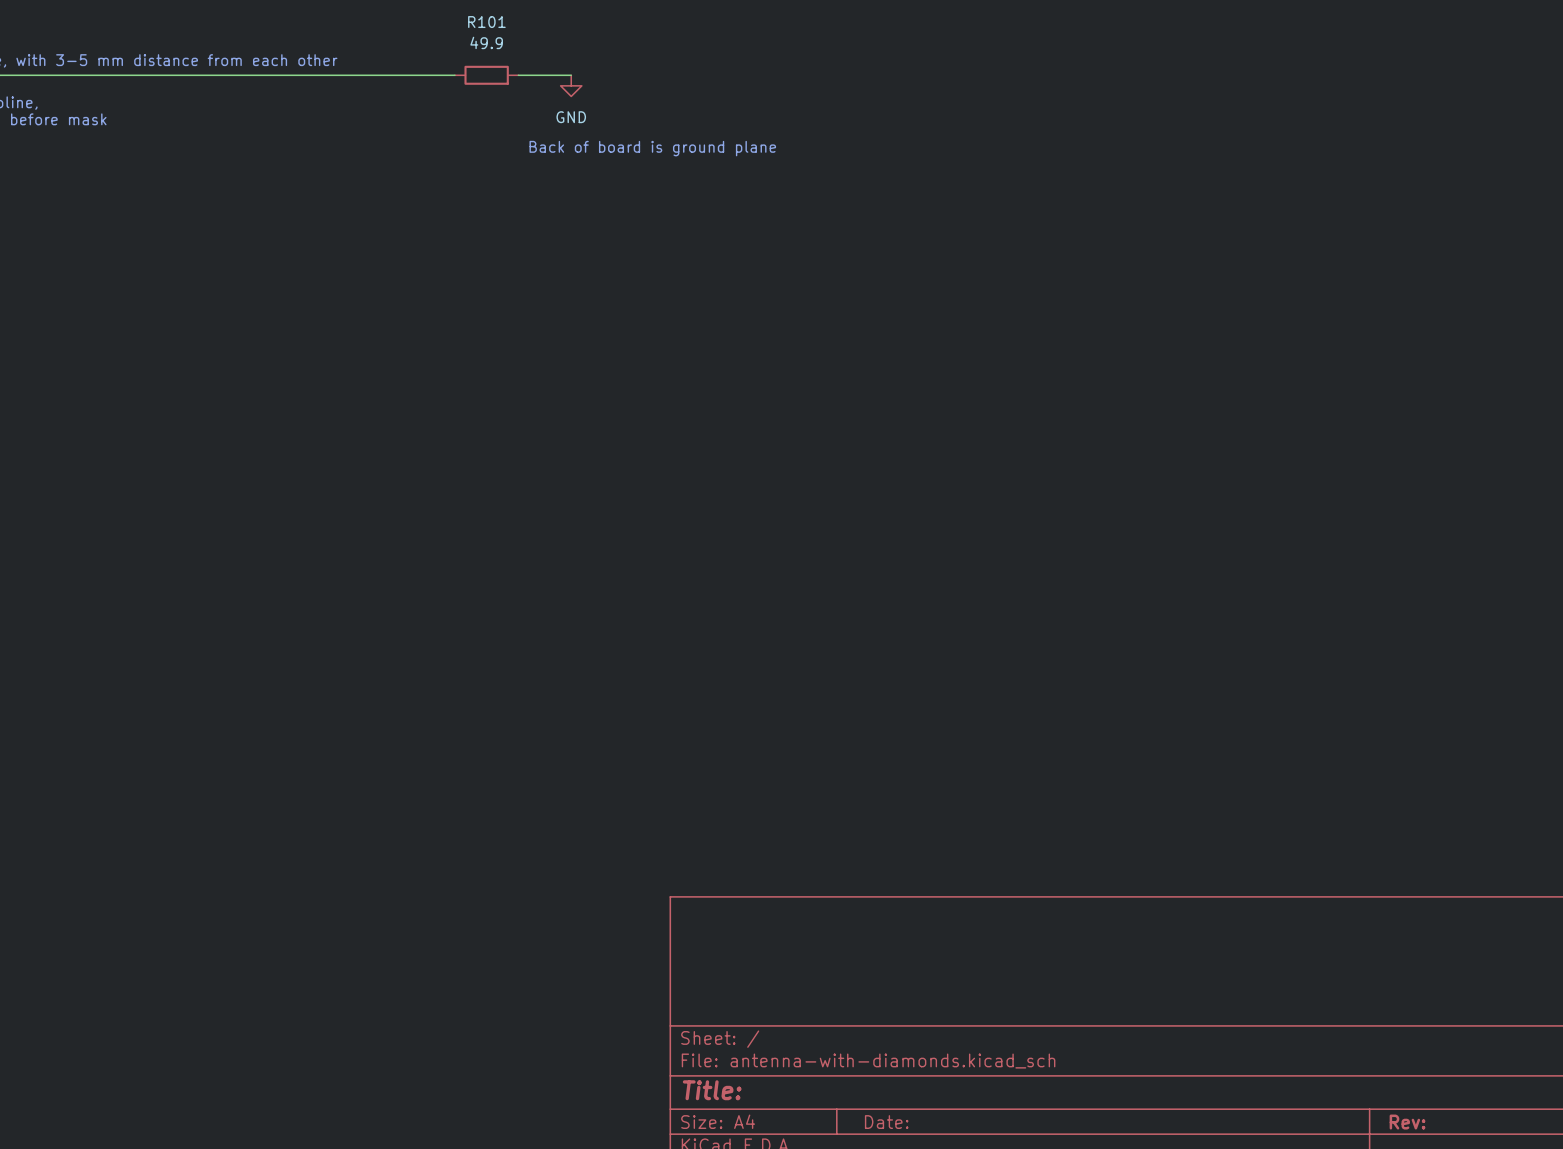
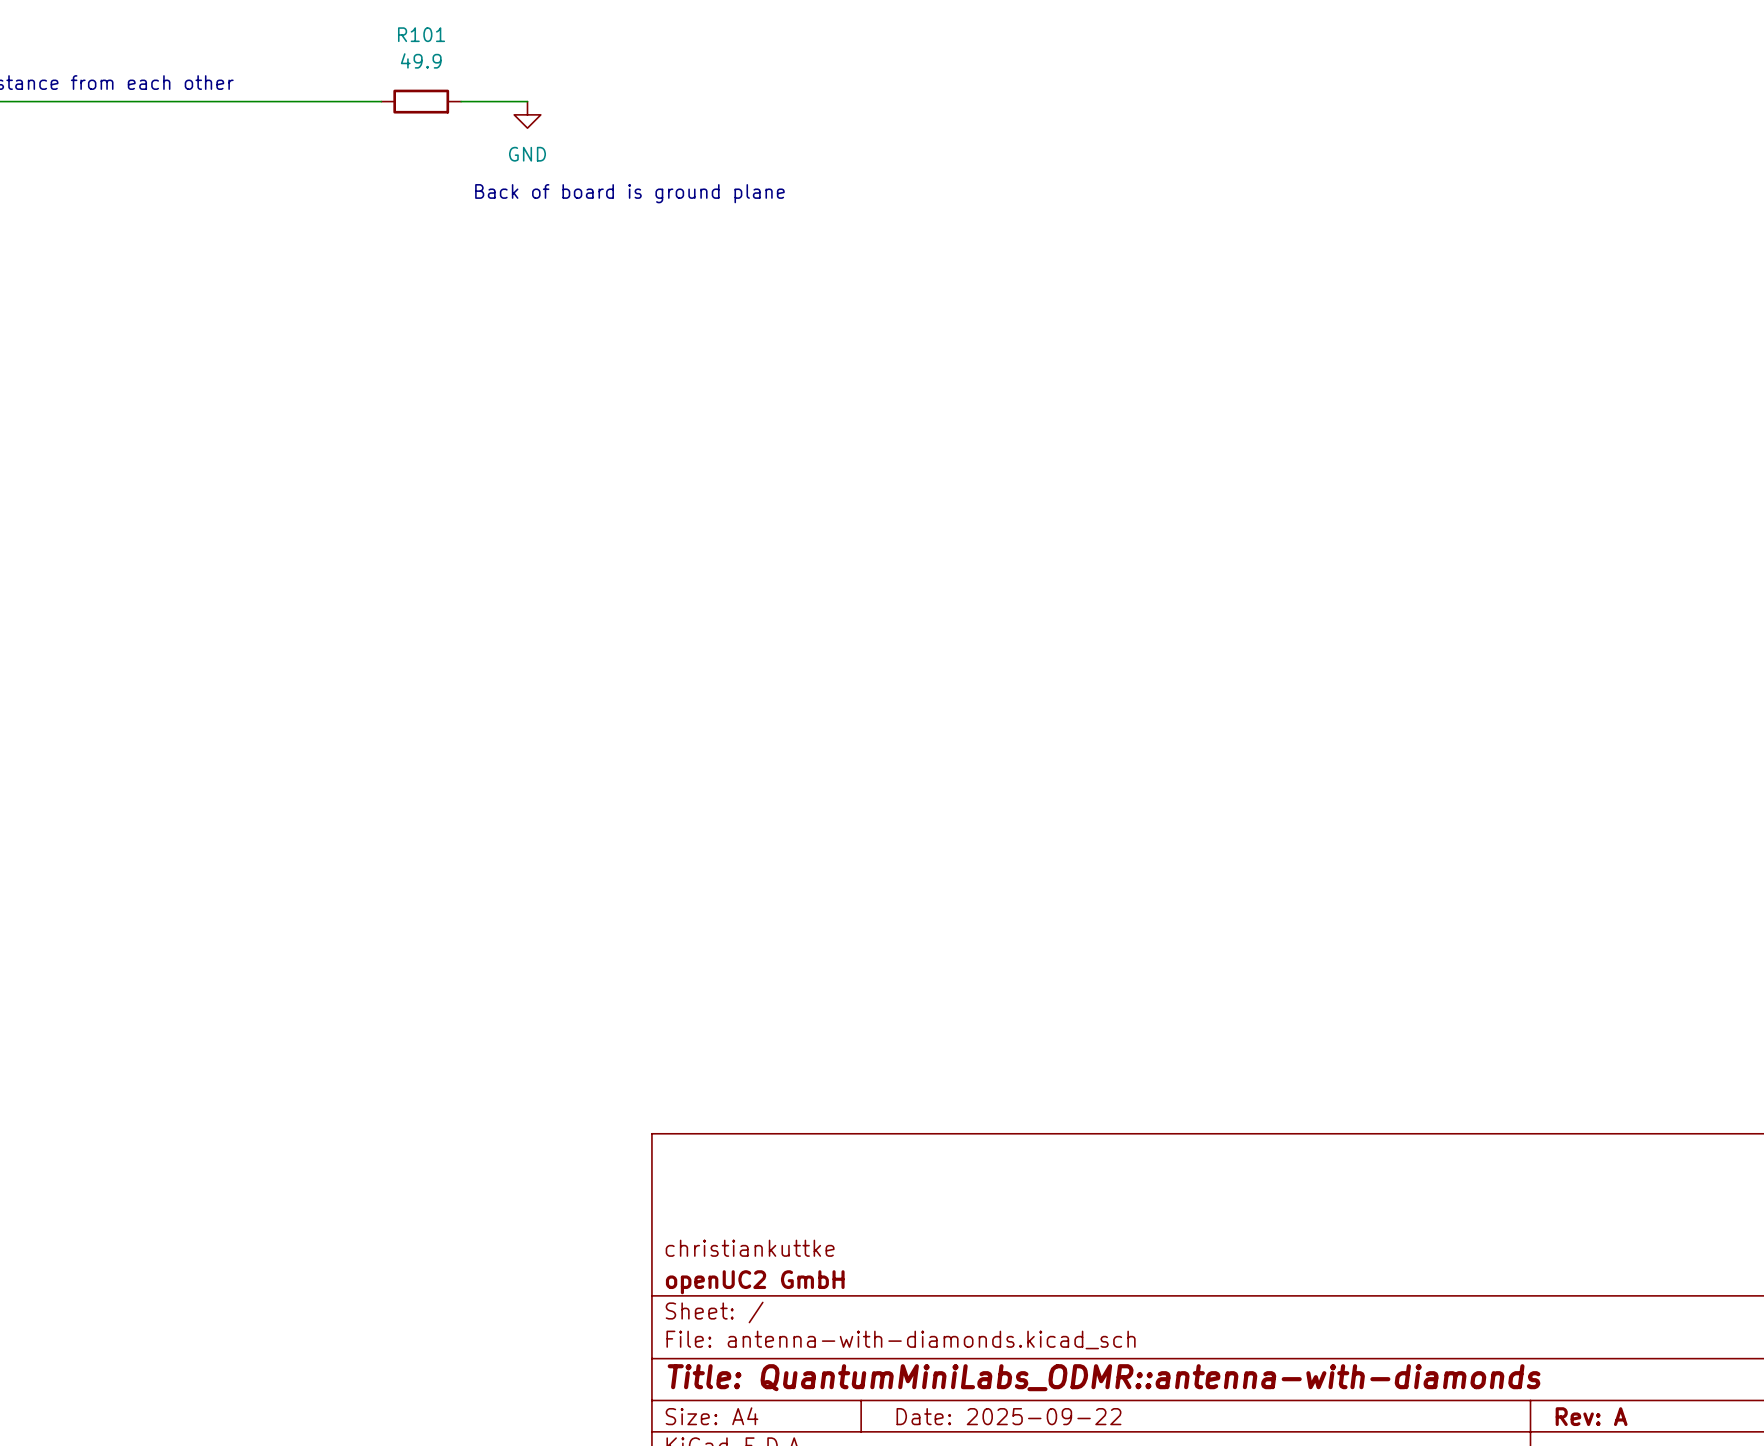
title block: none -> christiankuttke (750, 1248)
title block: none -> openUC2 GmbH (755, 1282)
title block: Title: (712, 1090) -> Title: QuantumMiniLabs_ODMR::antenna-with-diamonds (1104, 1377)
title block: Date: (886, 1122) -> Date: 2025-09-22 (1008, 1416)
title block: Rev: (1407, 1122) -> Rev: A (1591, 1416)

